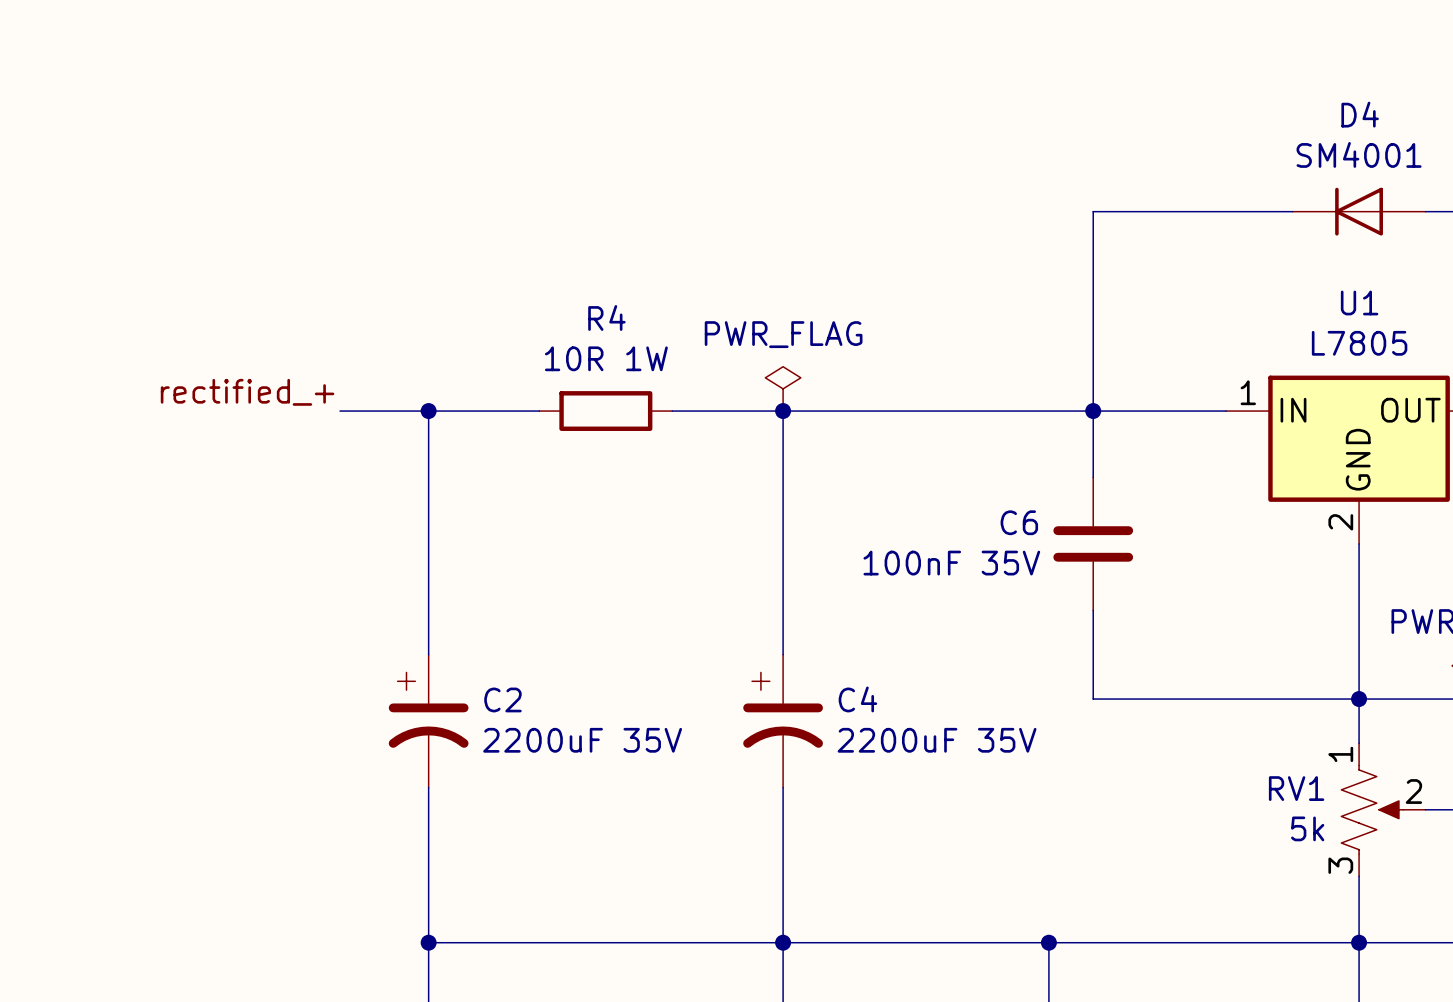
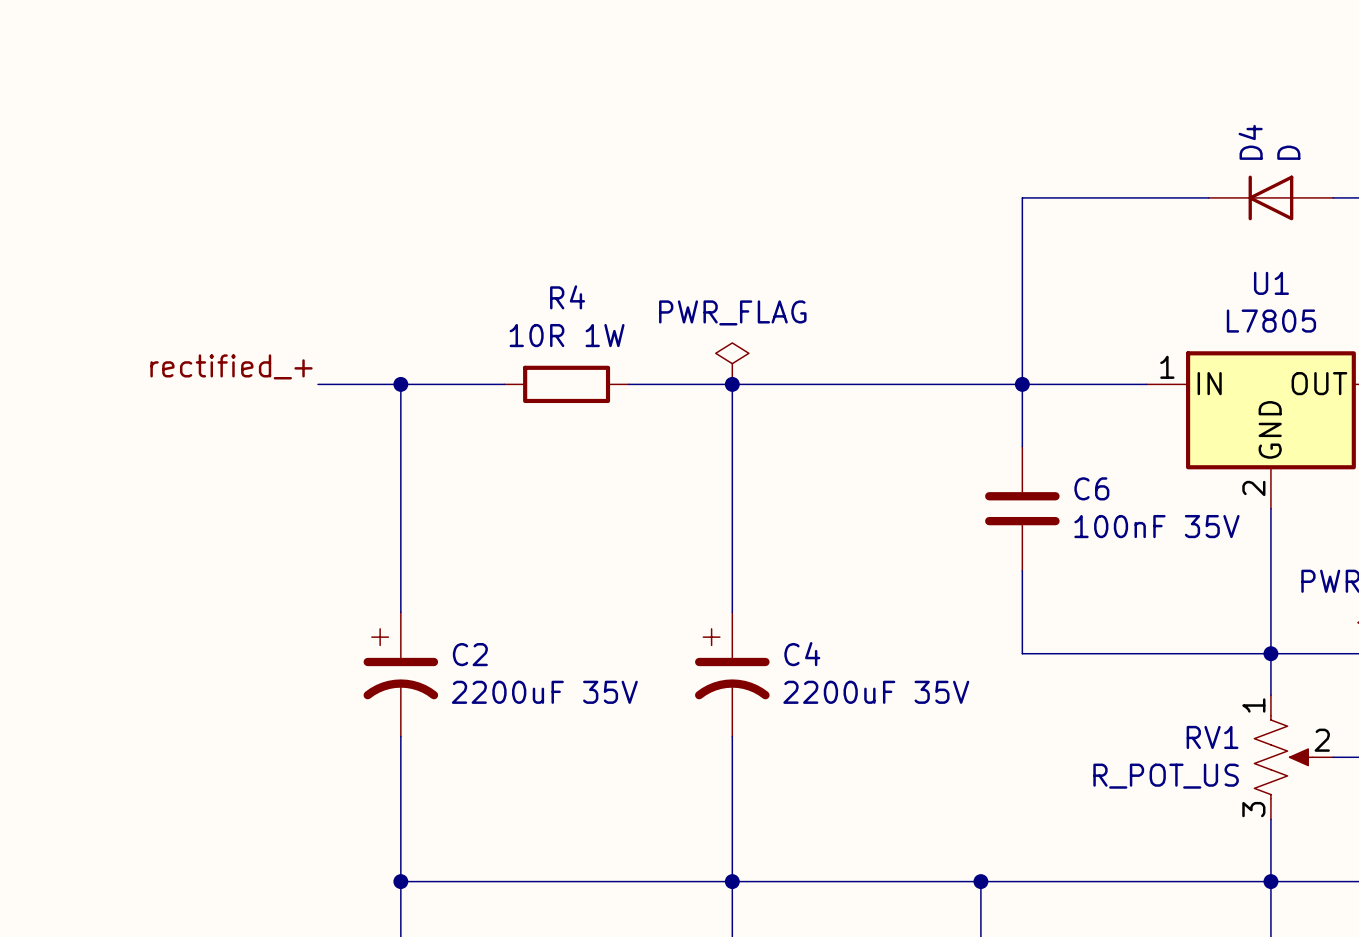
D4 name rotation: 0° (1360, 114) -> 90° counterclockwise (1250, 142)
D4 value: SM4001 (1359, 154) -> D (1288, 152)
C6 name position: C6 (1019, 522) -> C6 (1091, 488)
C6 value position: 100nF 35V (951, 563) -> 100nF 35V (1156, 526)
RV1 value: 5k (1307, 828) -> R_POT_US (1166, 776)

